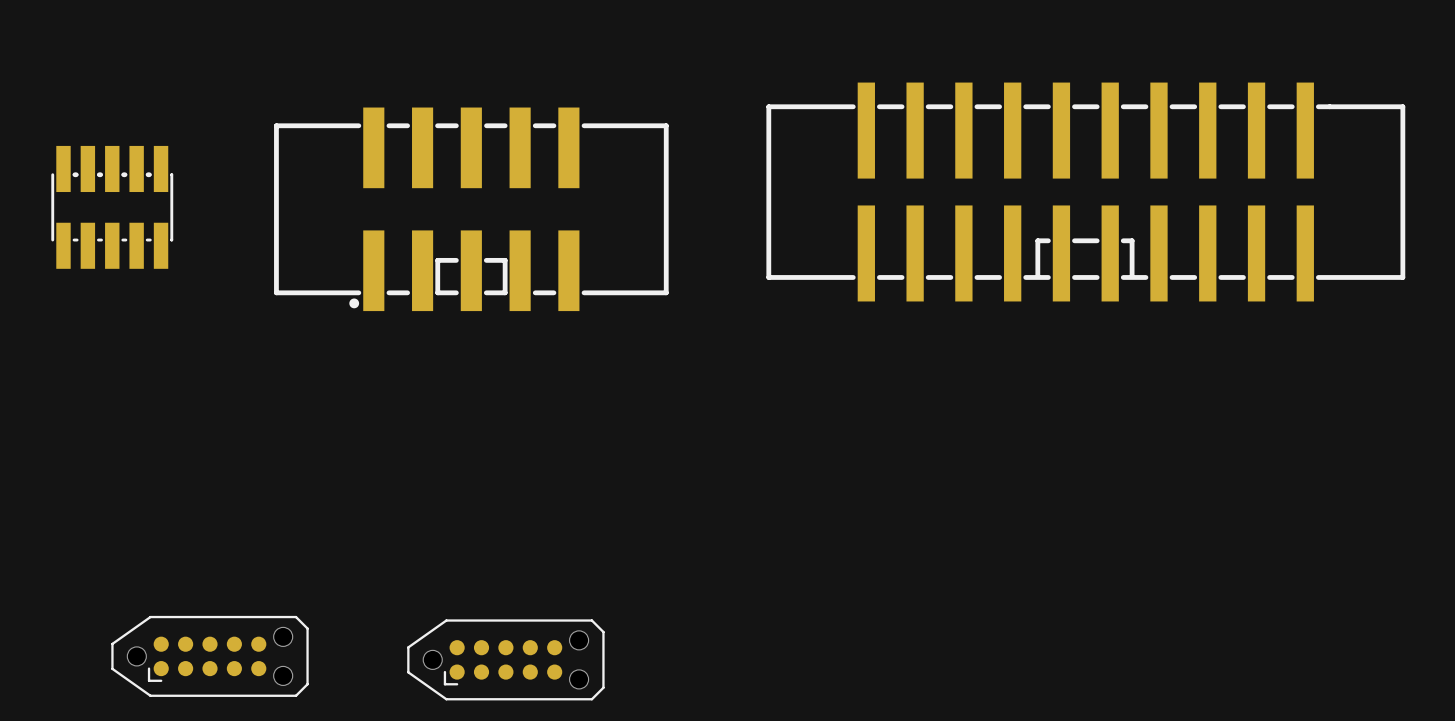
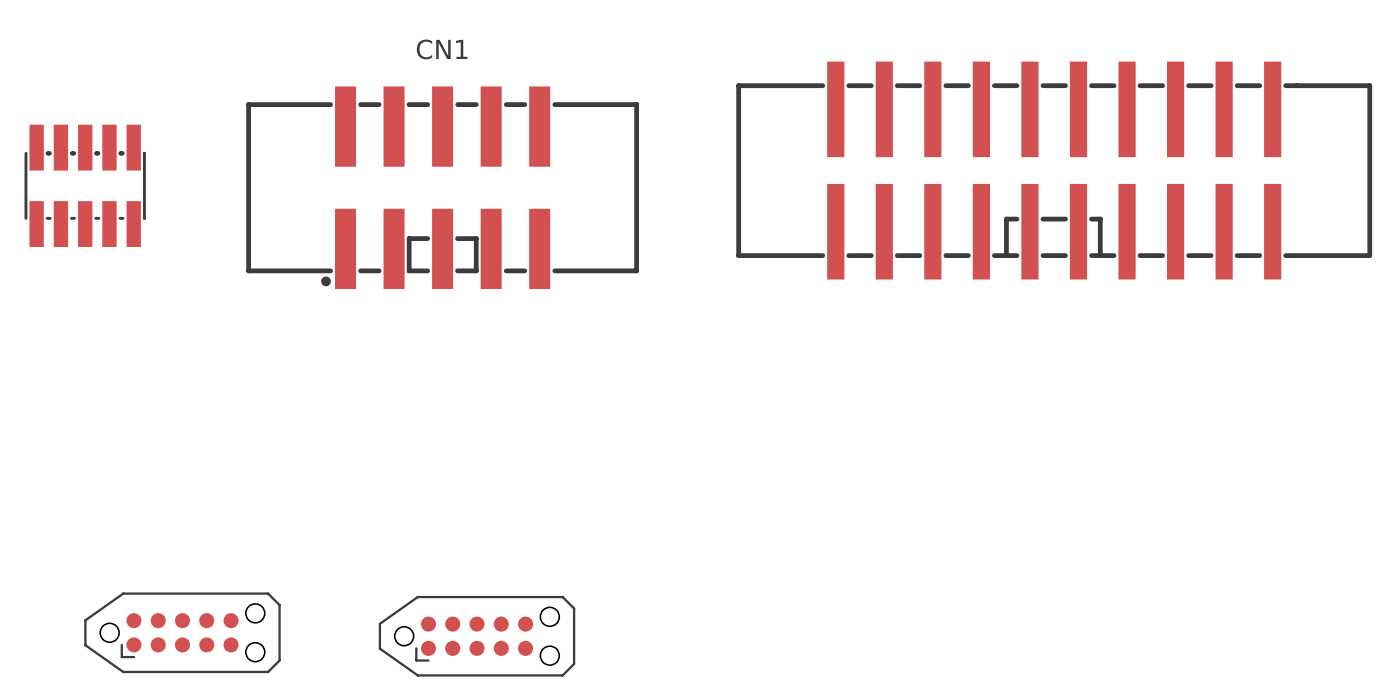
CN1 name: none -> CN1 (442, 49)

